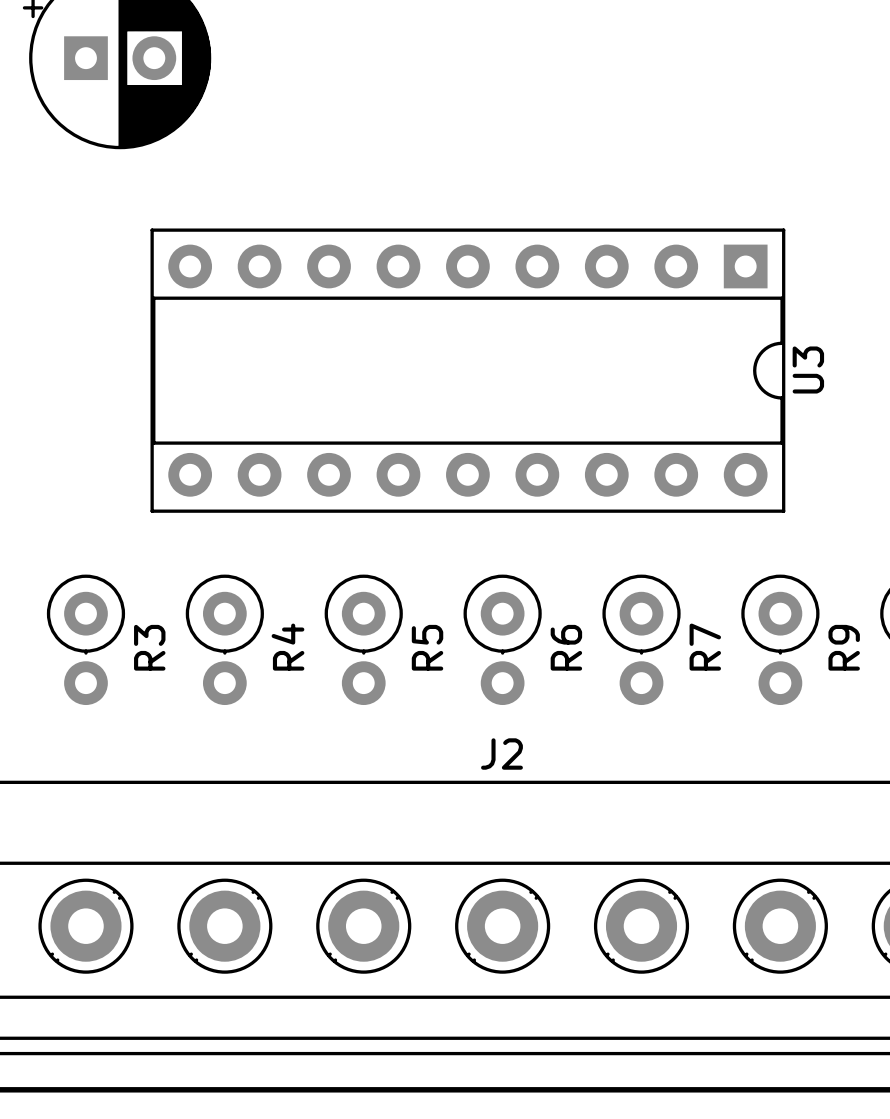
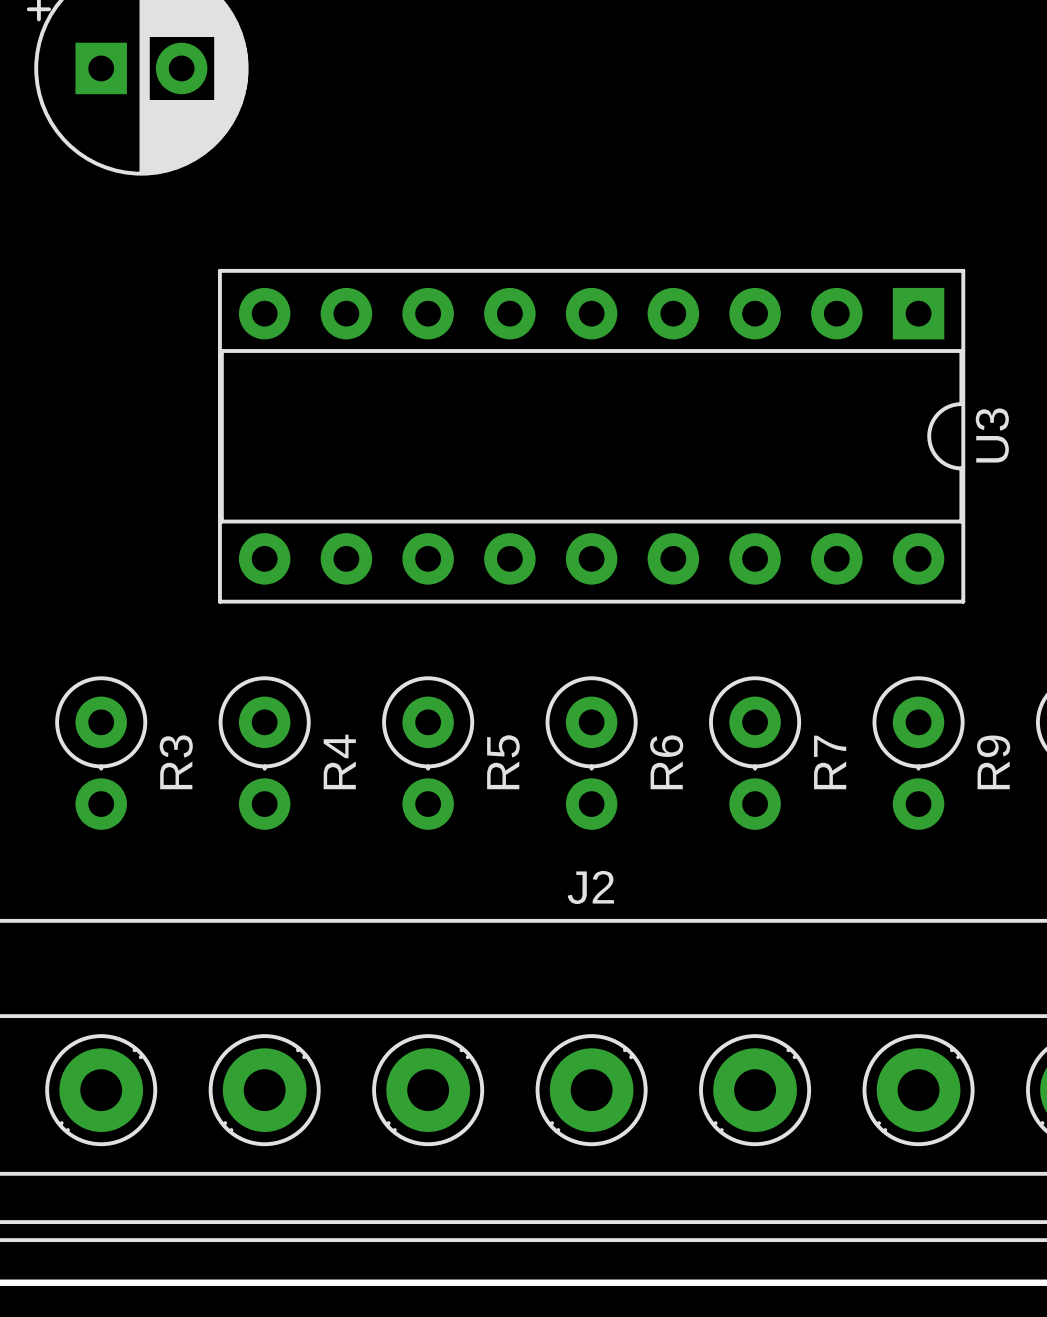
U3 position: (467, 370) -> (591, 436)

